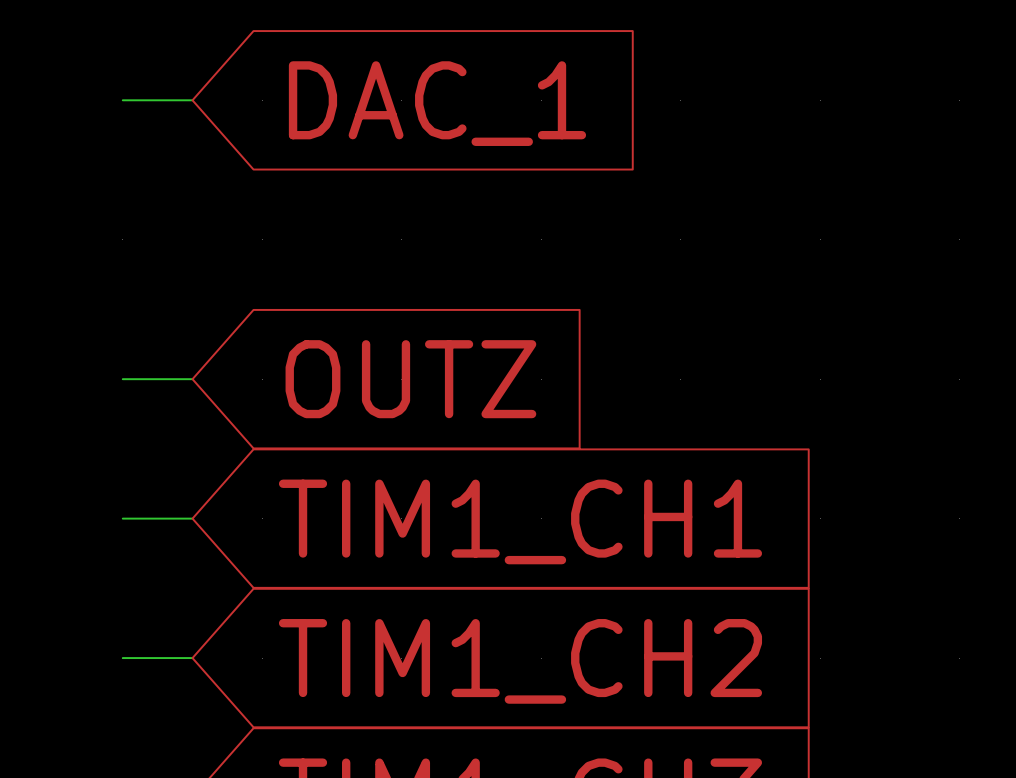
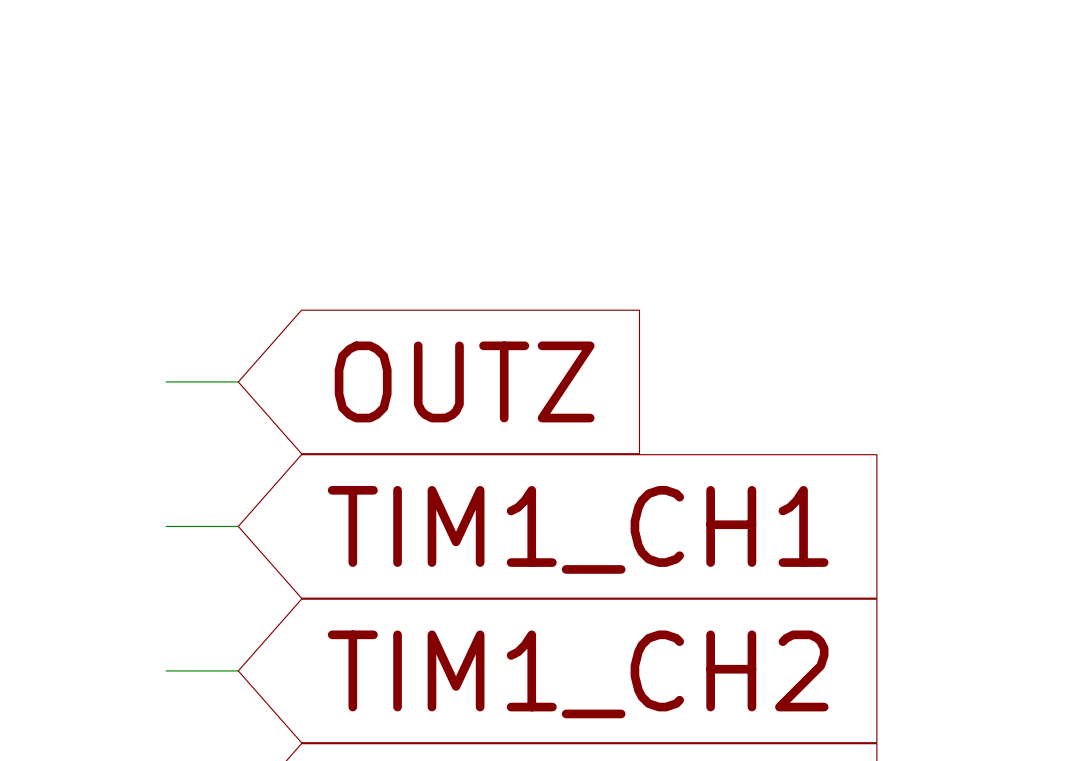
wire: (122, 100) (192, 100) -> none
global label: DAC_1 (437, 103) -> none

